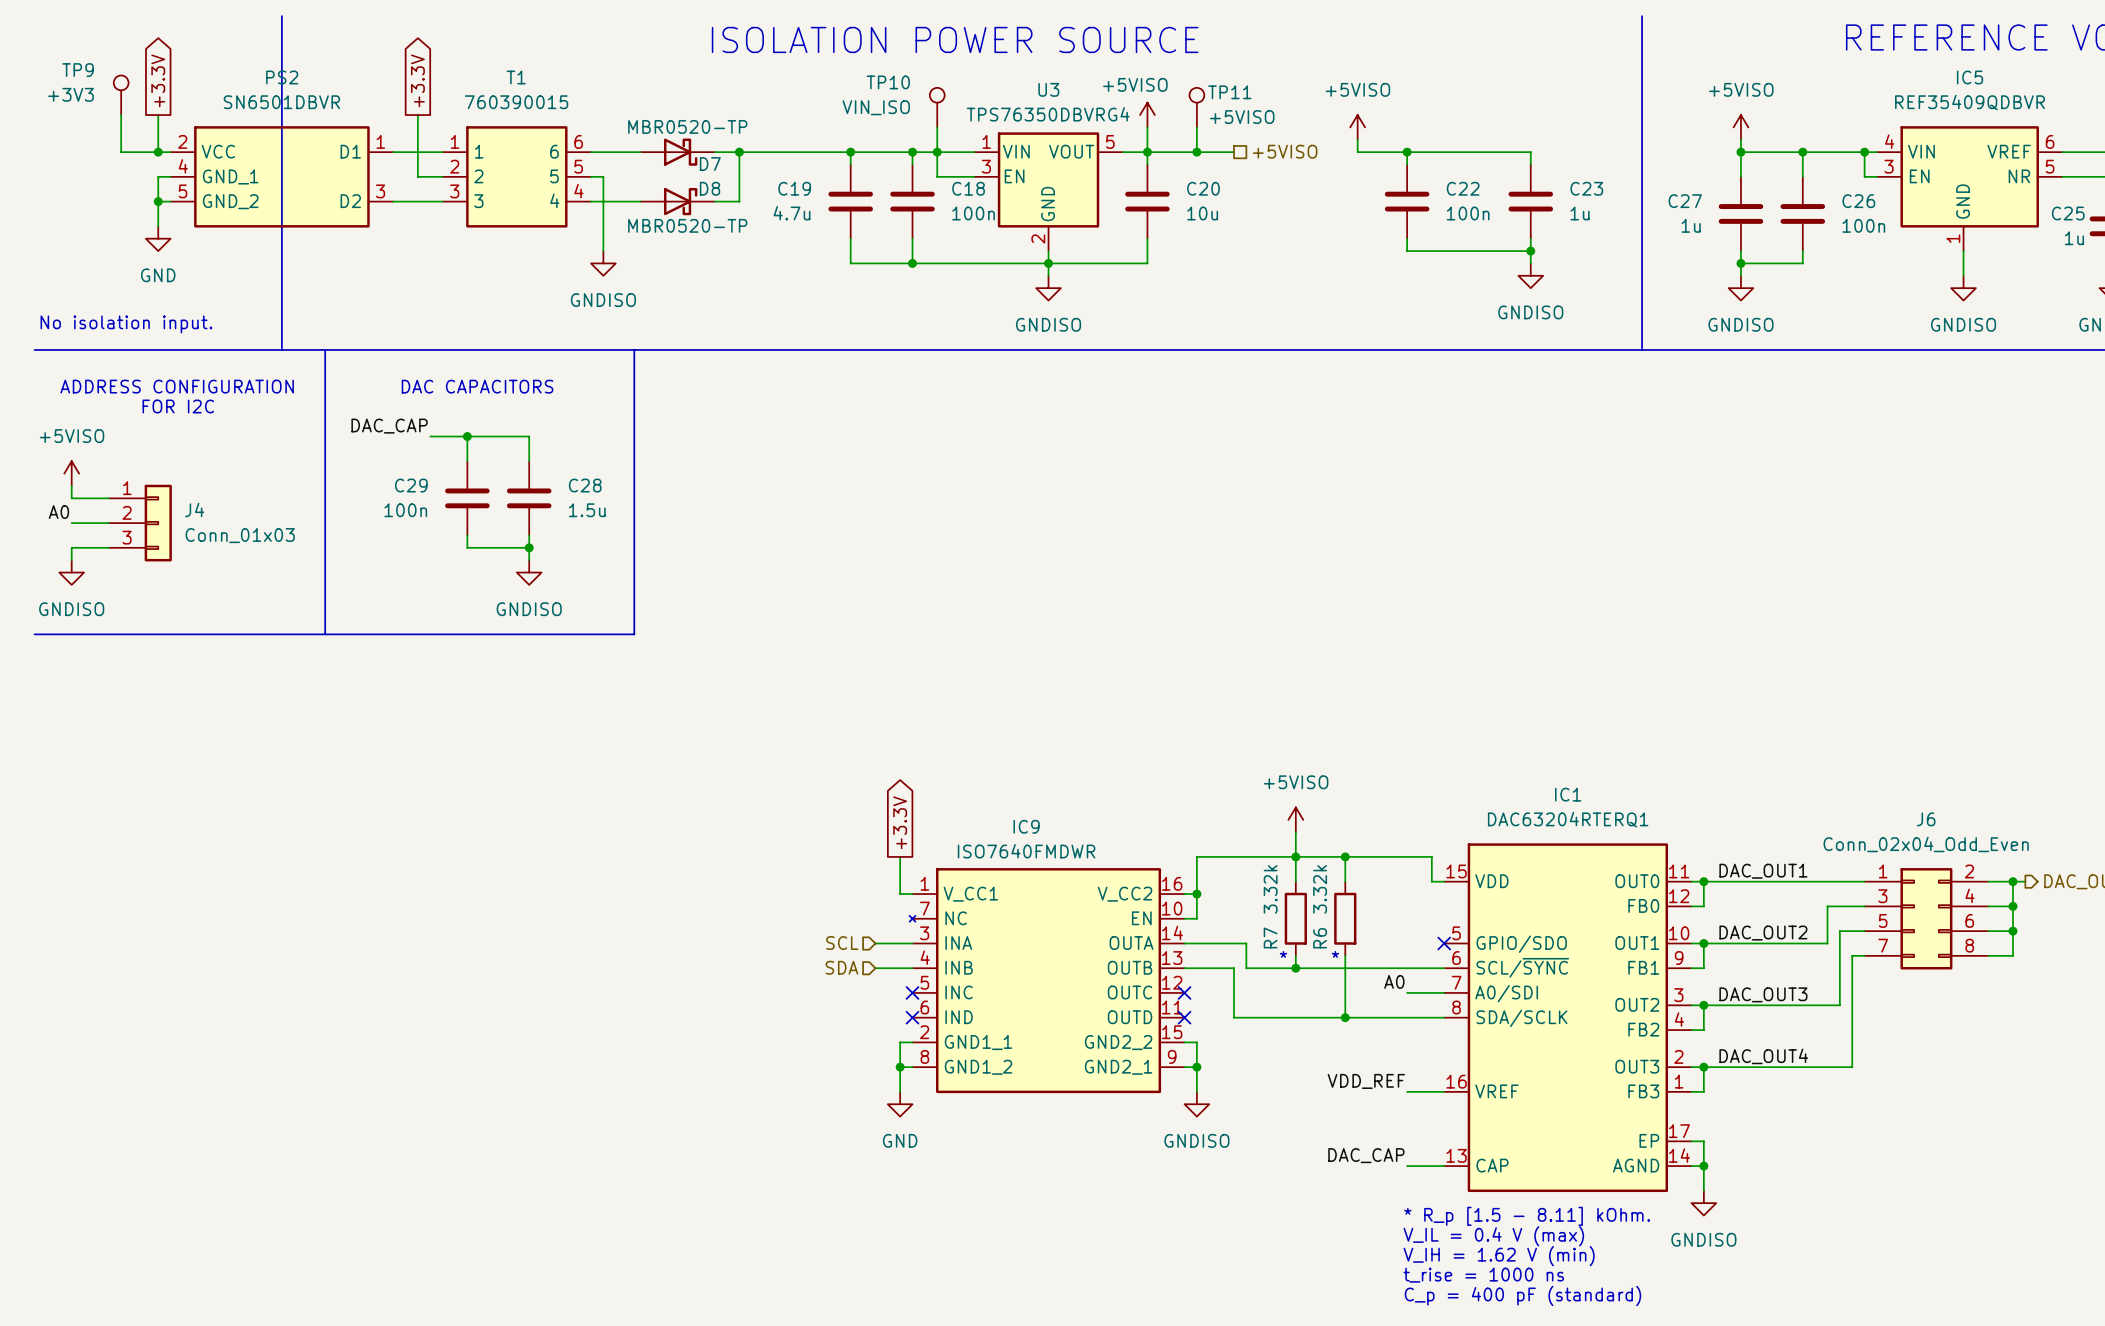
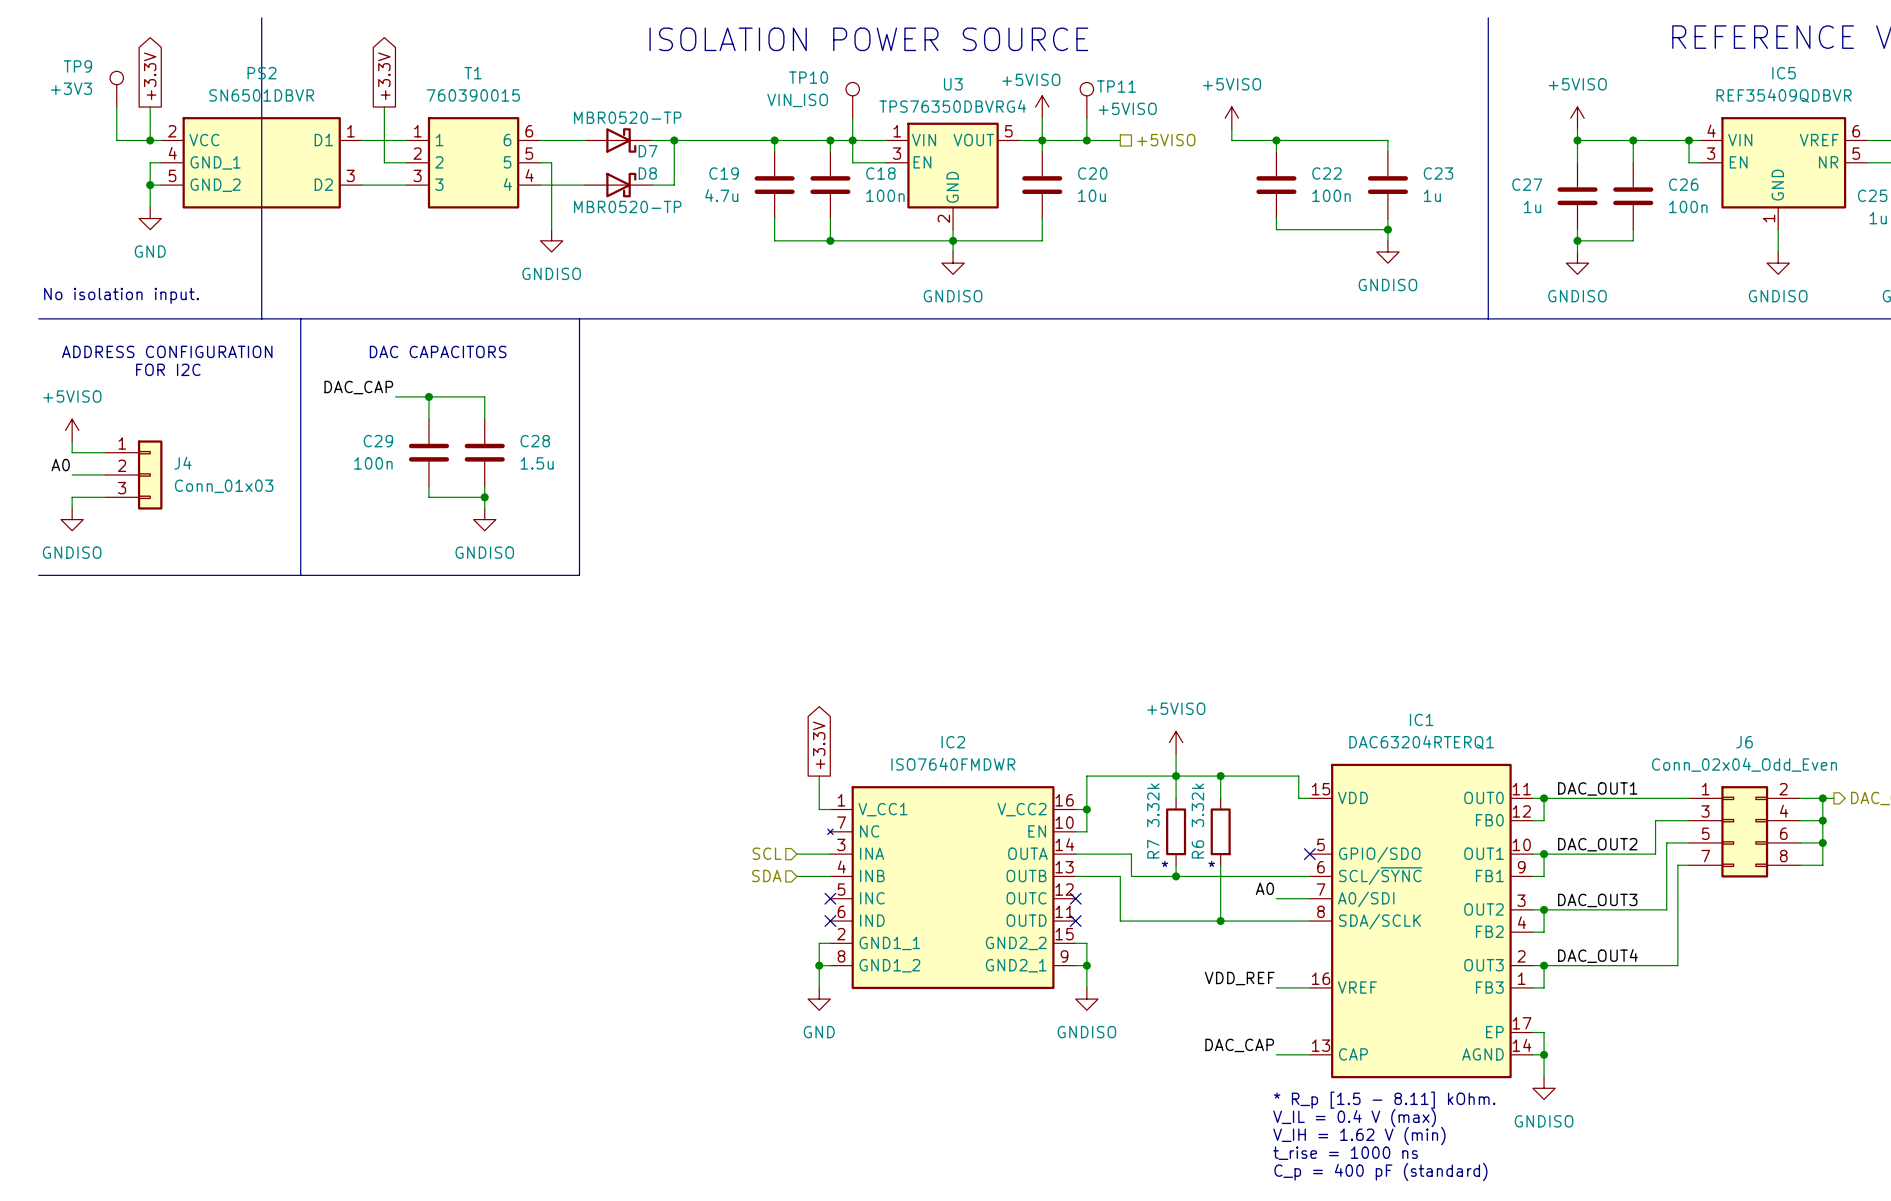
IC9 name: IC9 (1026, 826) -> IC2 (953, 742)
IC9 value position: ISO7640FMDWR (1026, 851) -> ISO7640FMDWR (953, 764)

